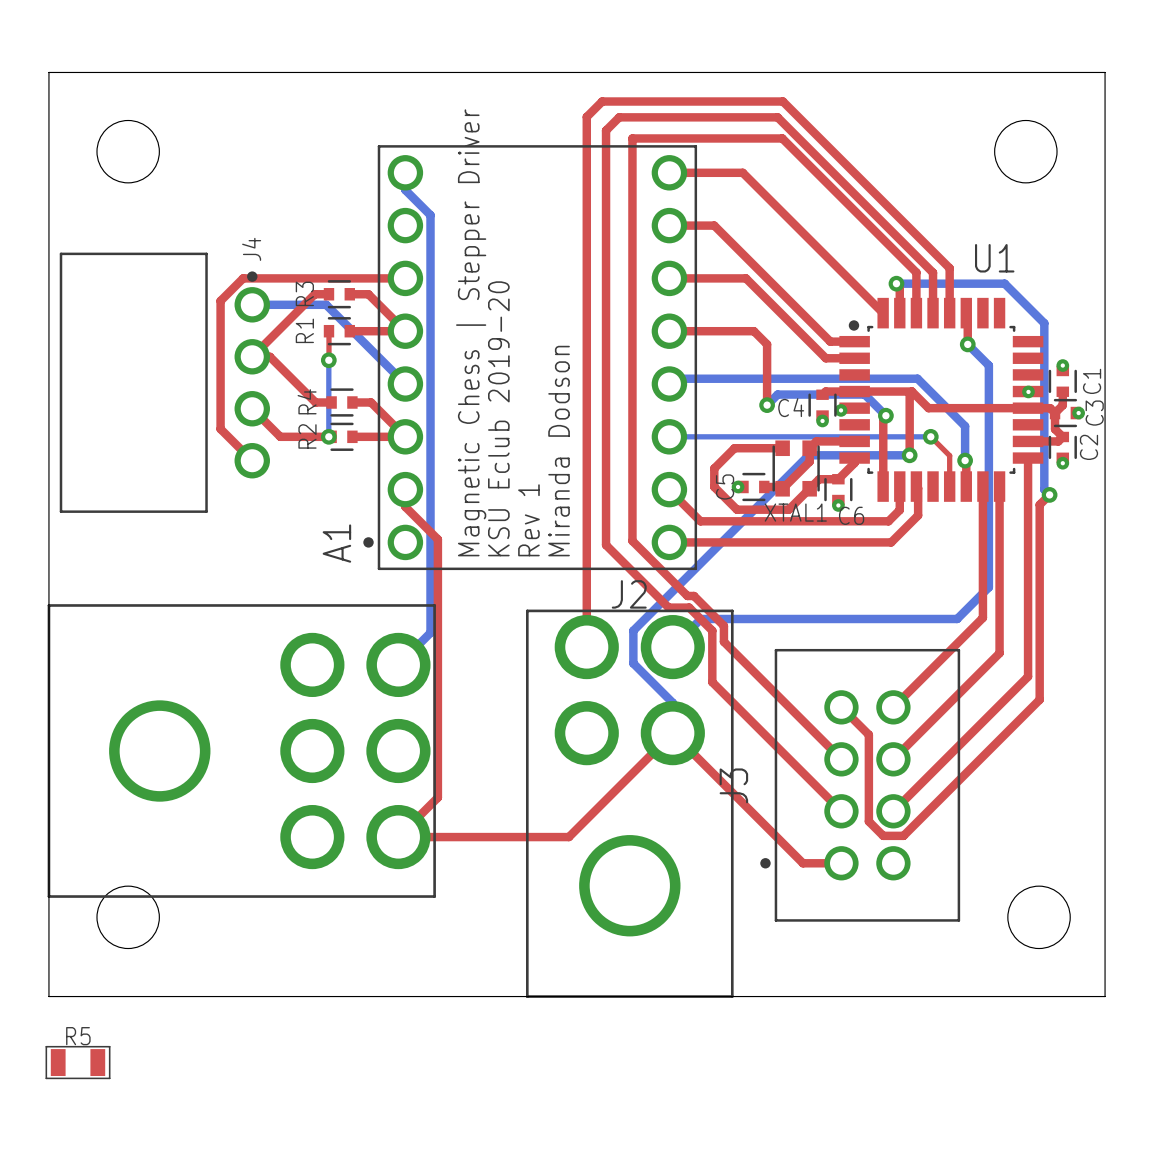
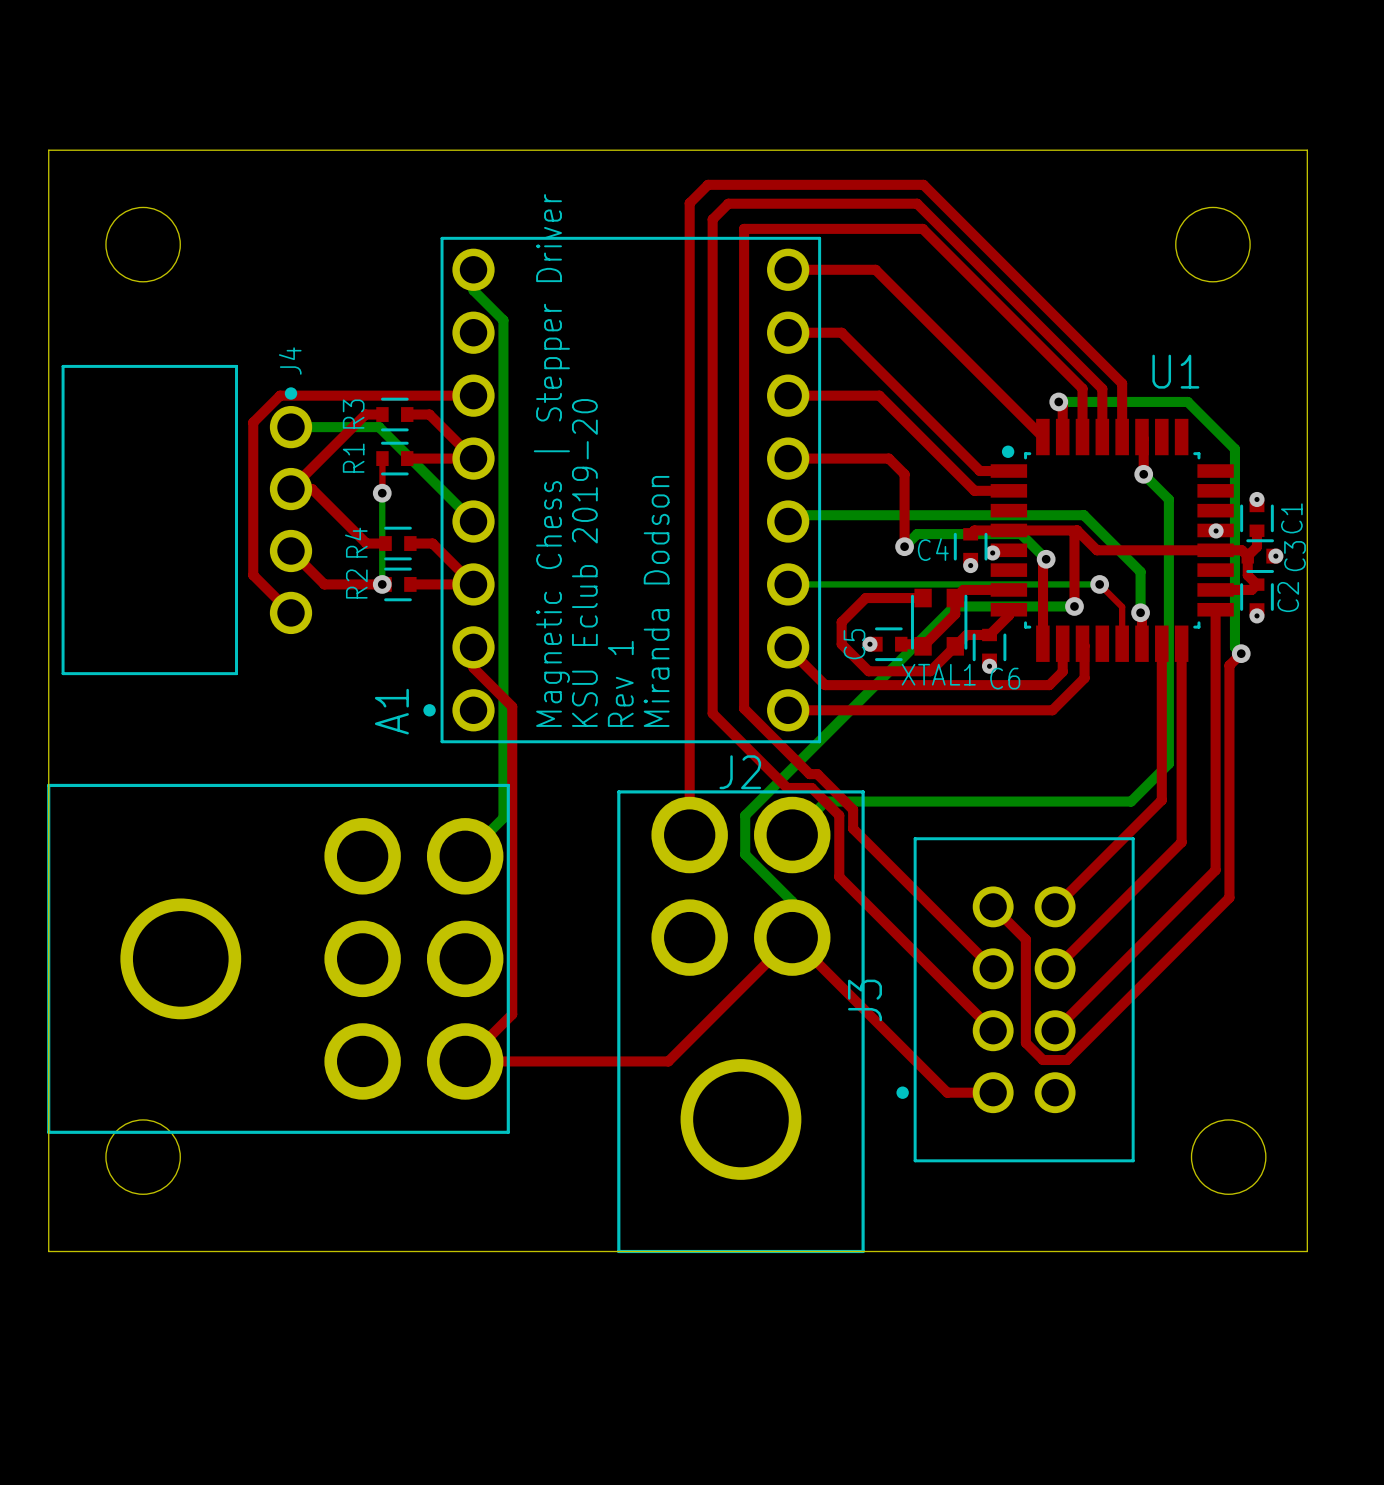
R5: (78, 1062) -> none

